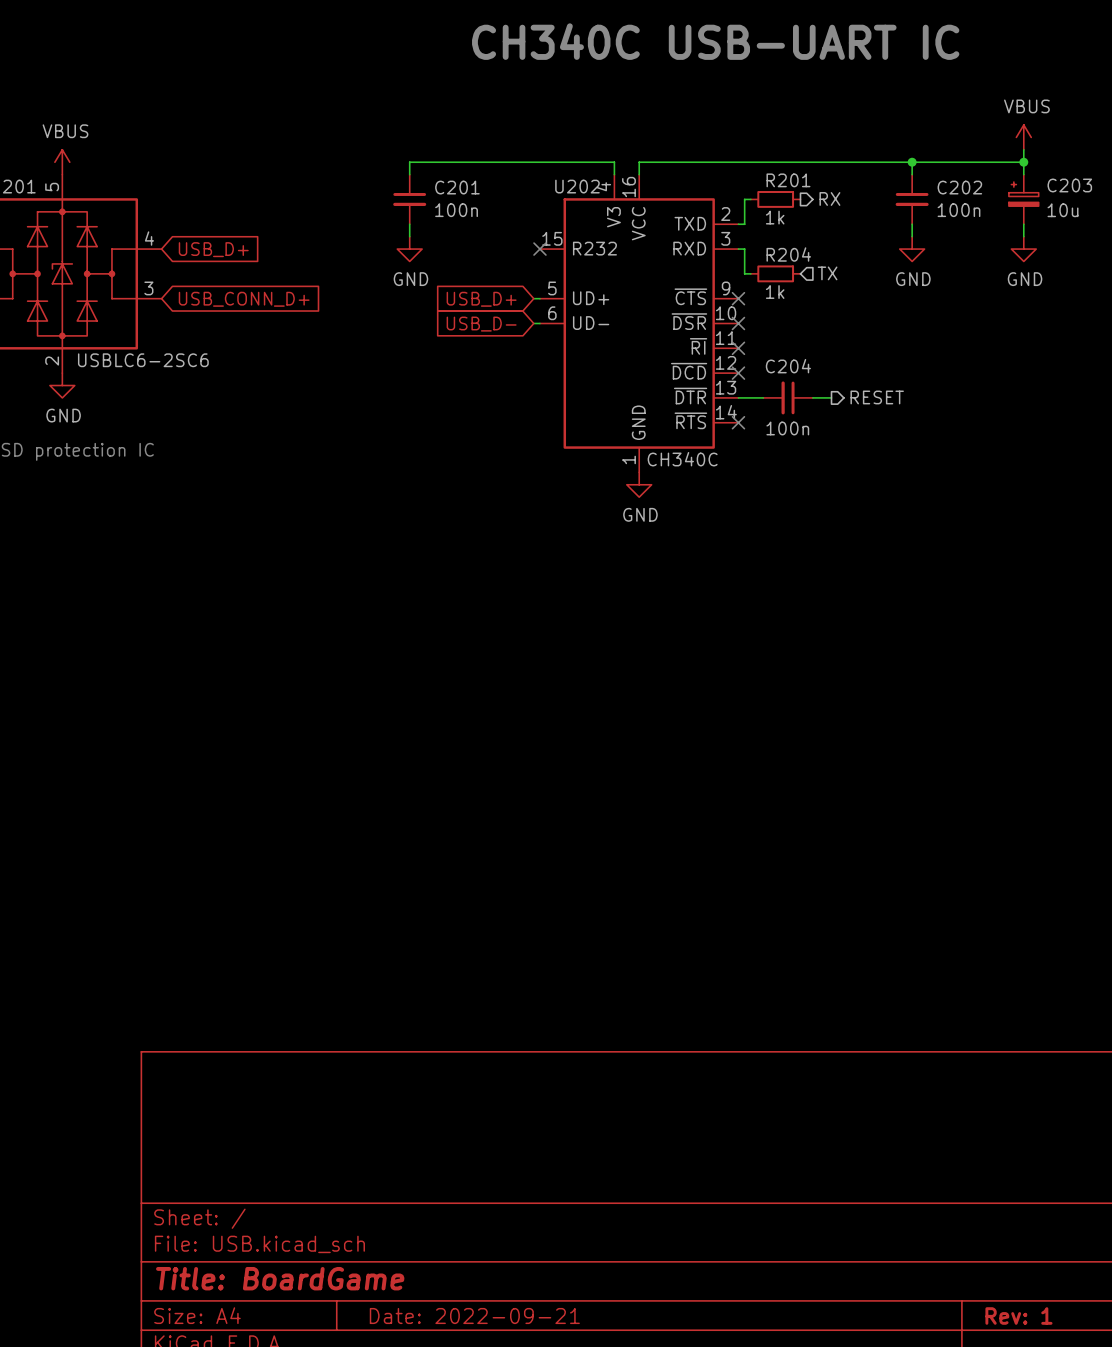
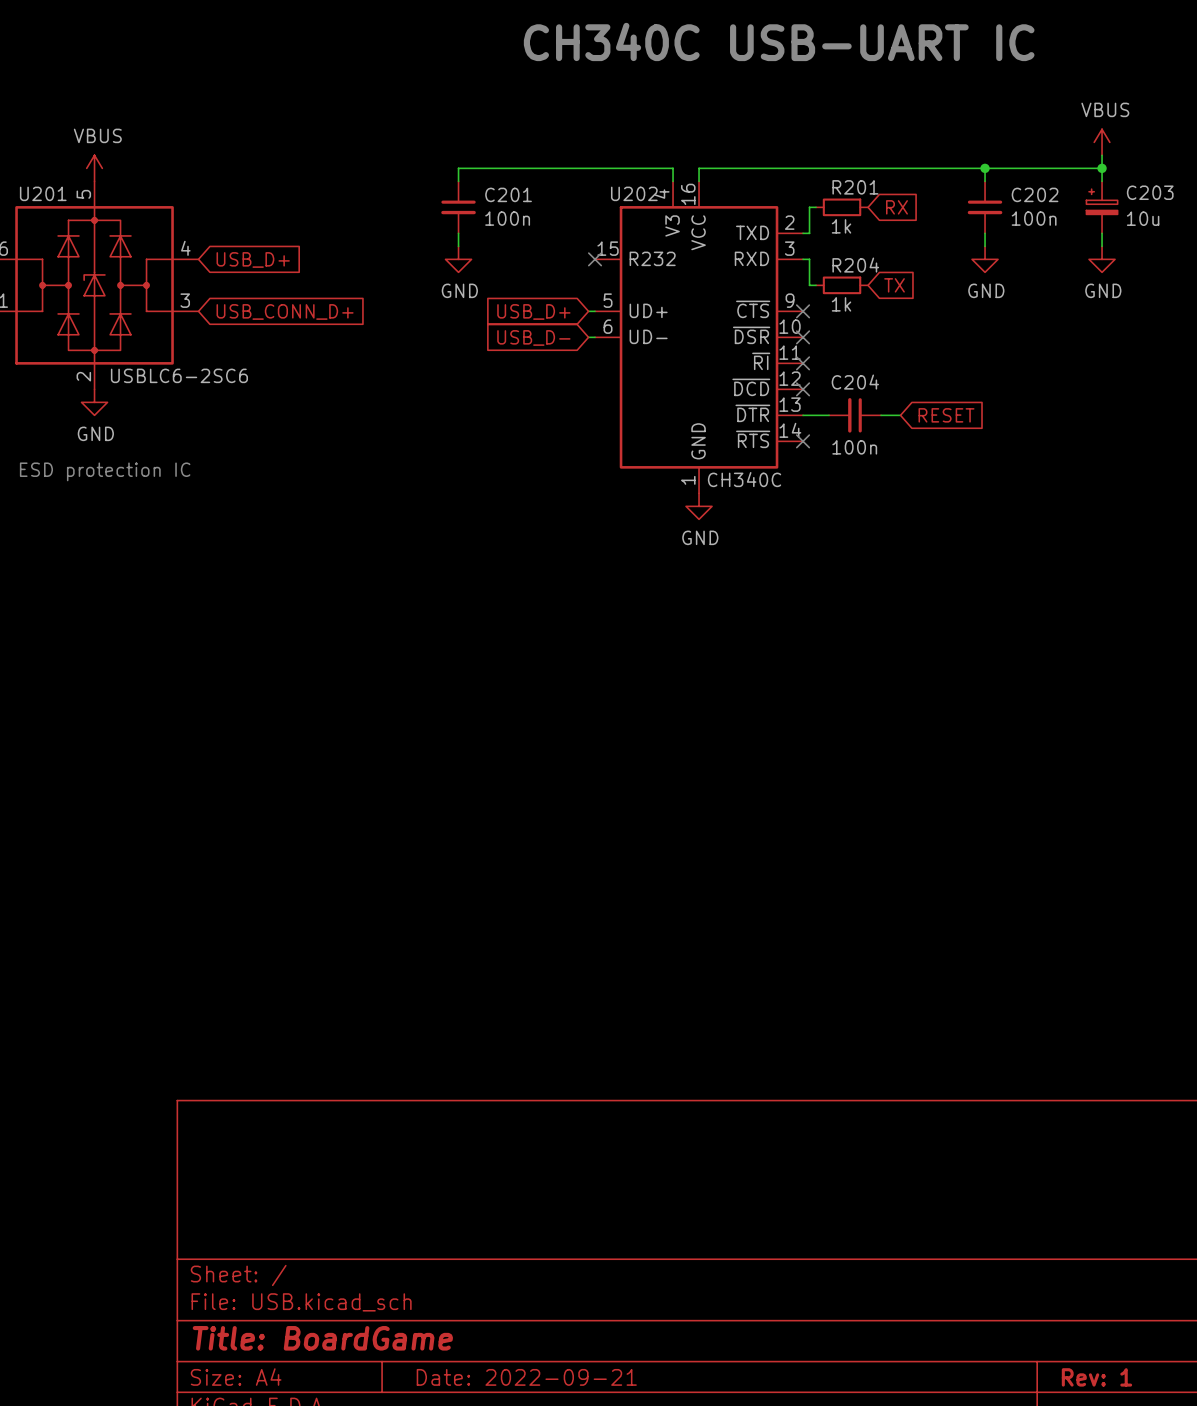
hierarchical label: RX (829, 198) -> none
global label: none -> RX (896, 207)
global label: none -> TX (894, 285)
hierarchical label: TX (827, 273) -> none
global label: none -> RESET (946, 415)
hierarchical label: RESET (877, 397) -> none

